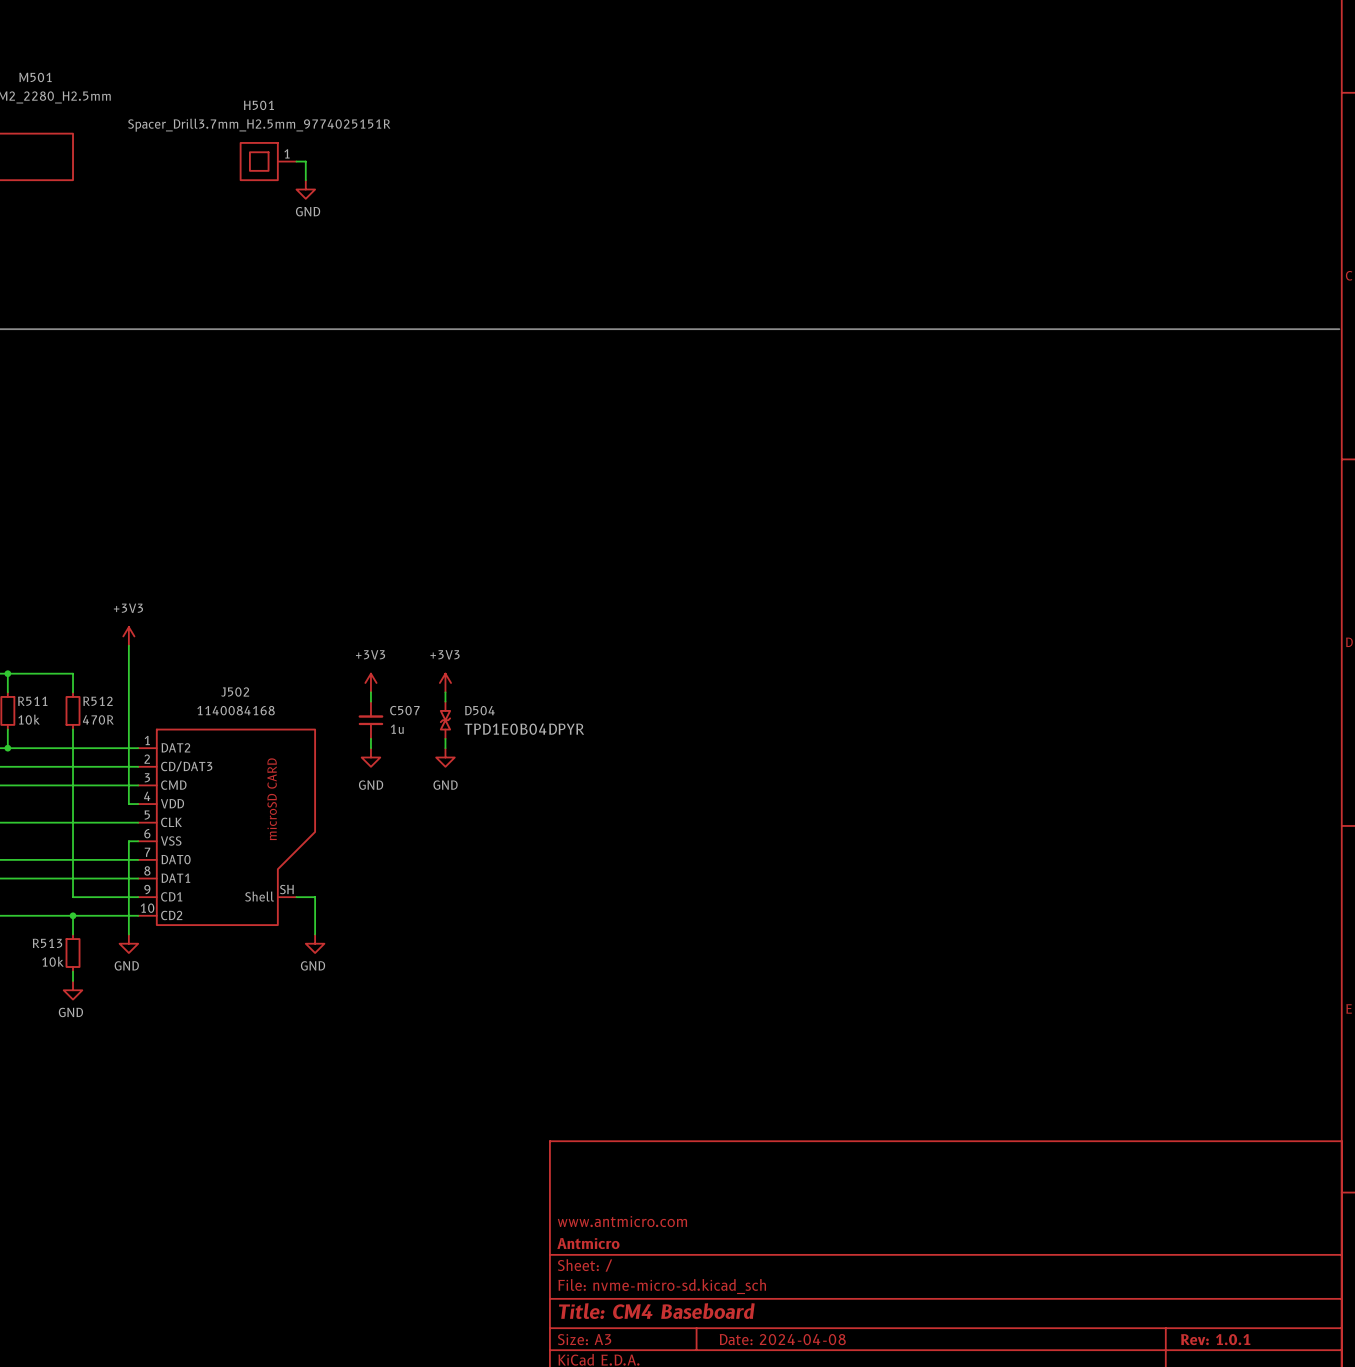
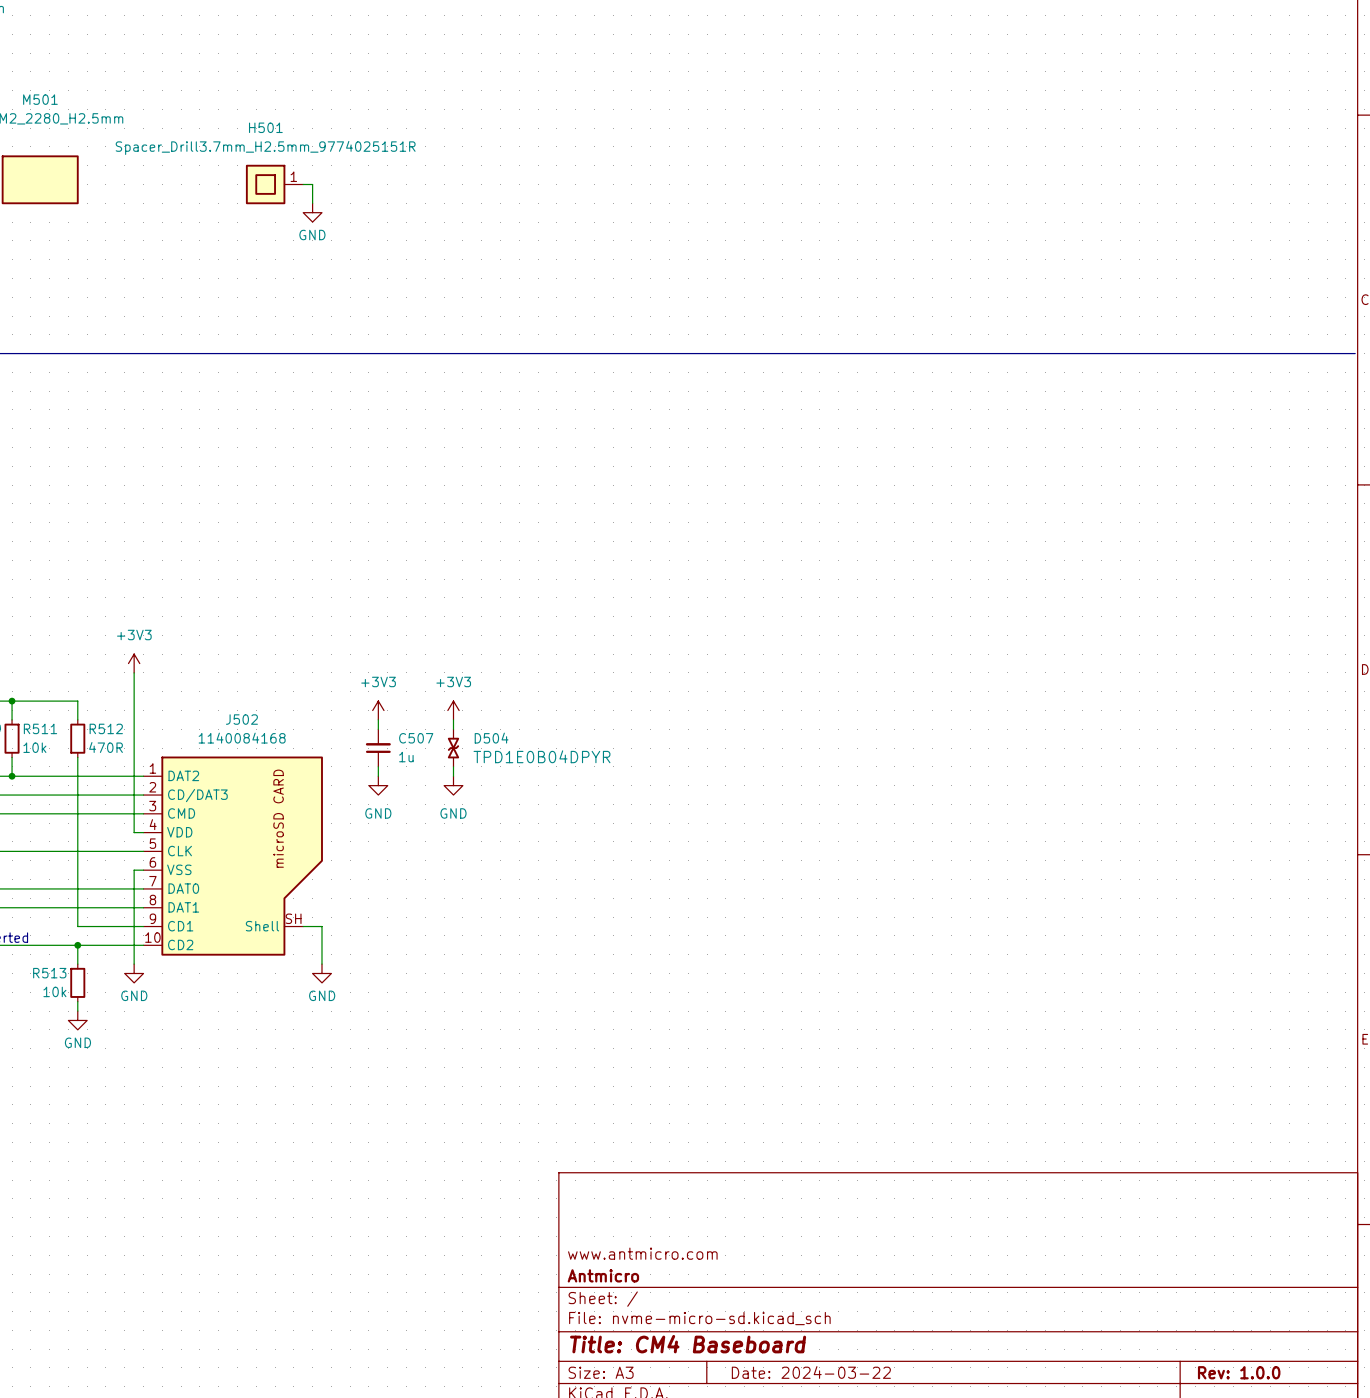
title block: Date: 2024-04-08 (782, 1339) -> Date: 2024-03-22 (811, 1372)
title block: Rev: 1.0.1 (1215, 1339) -> Rev: 1.0.0 (1239, 1372)

